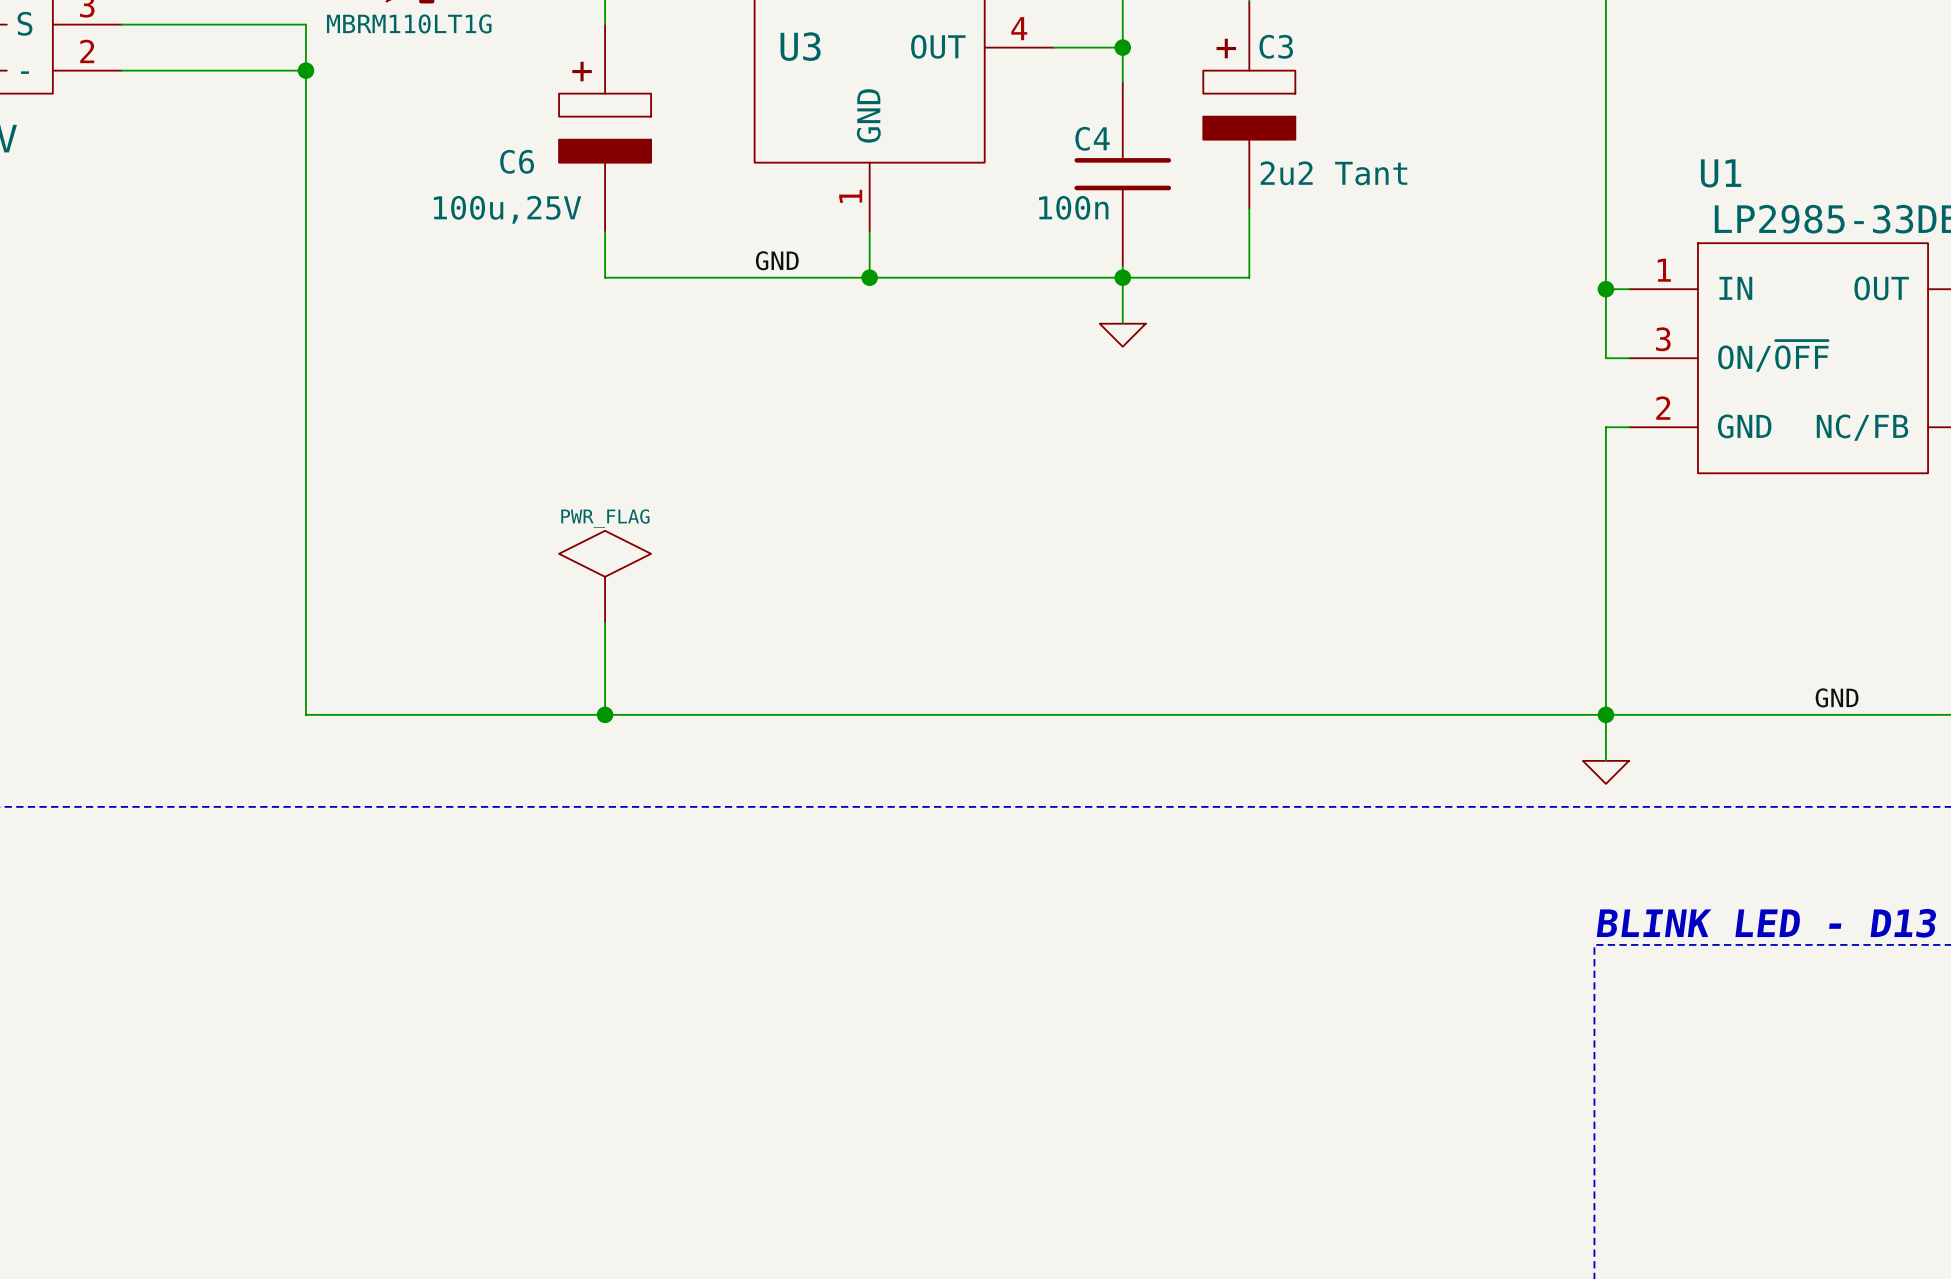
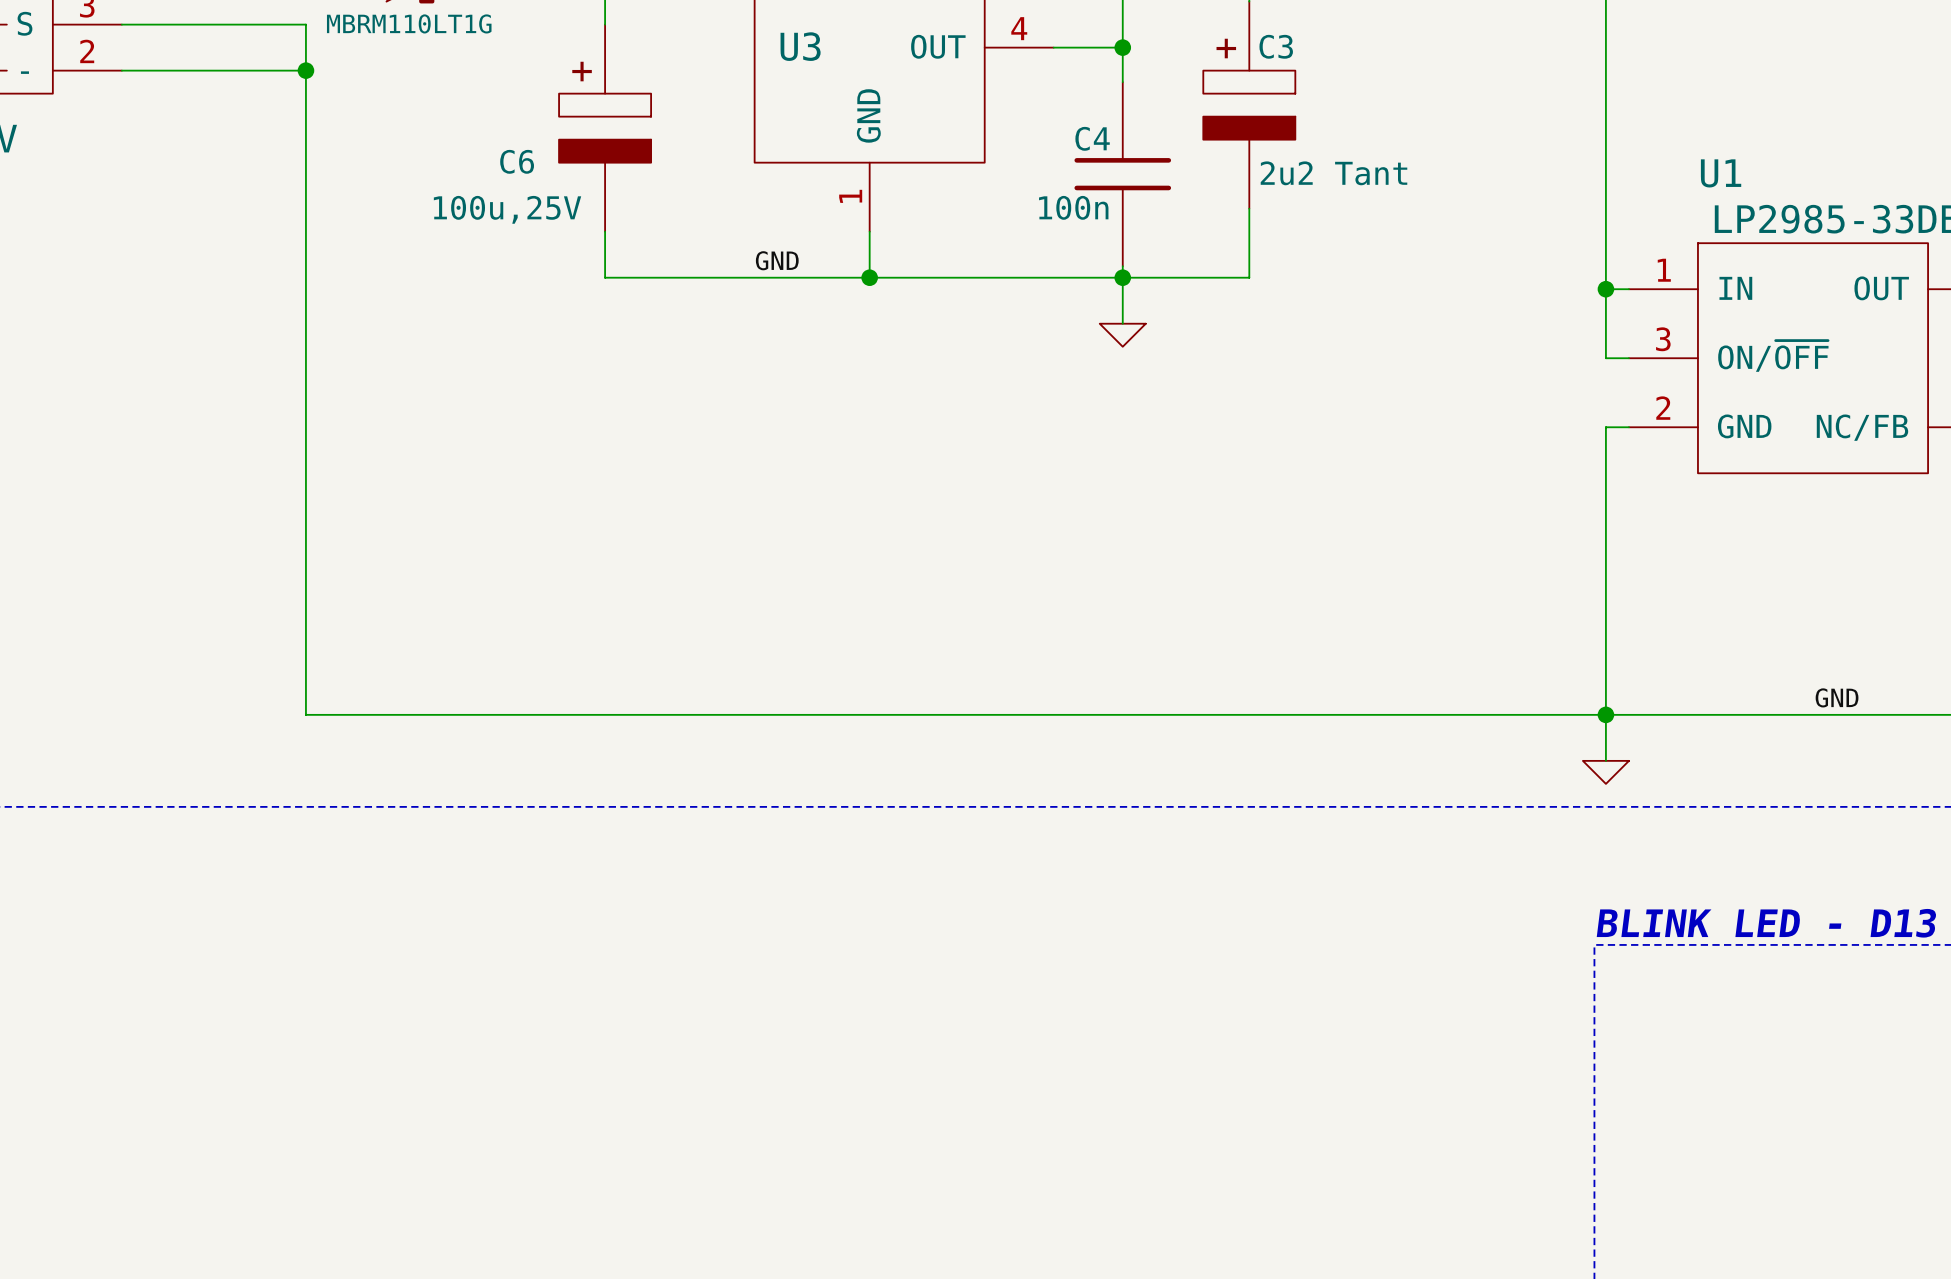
power symbol: PWR_FLAG (605, 576) -> none
wire: (605, 622) (605, 714) -> none
junction: (605, 714) -> none

